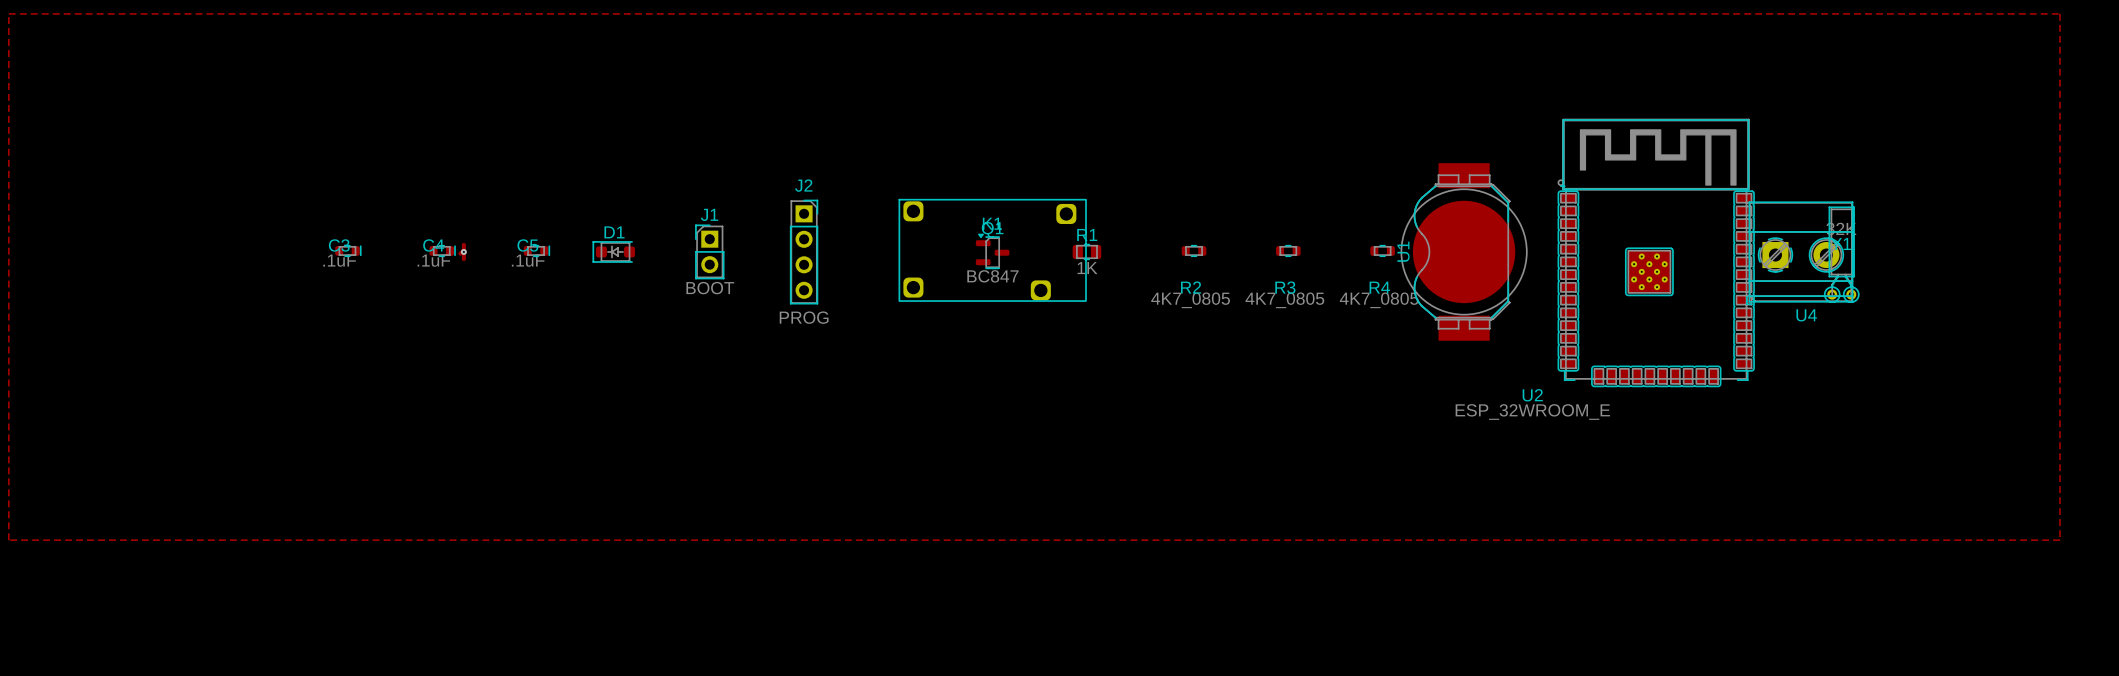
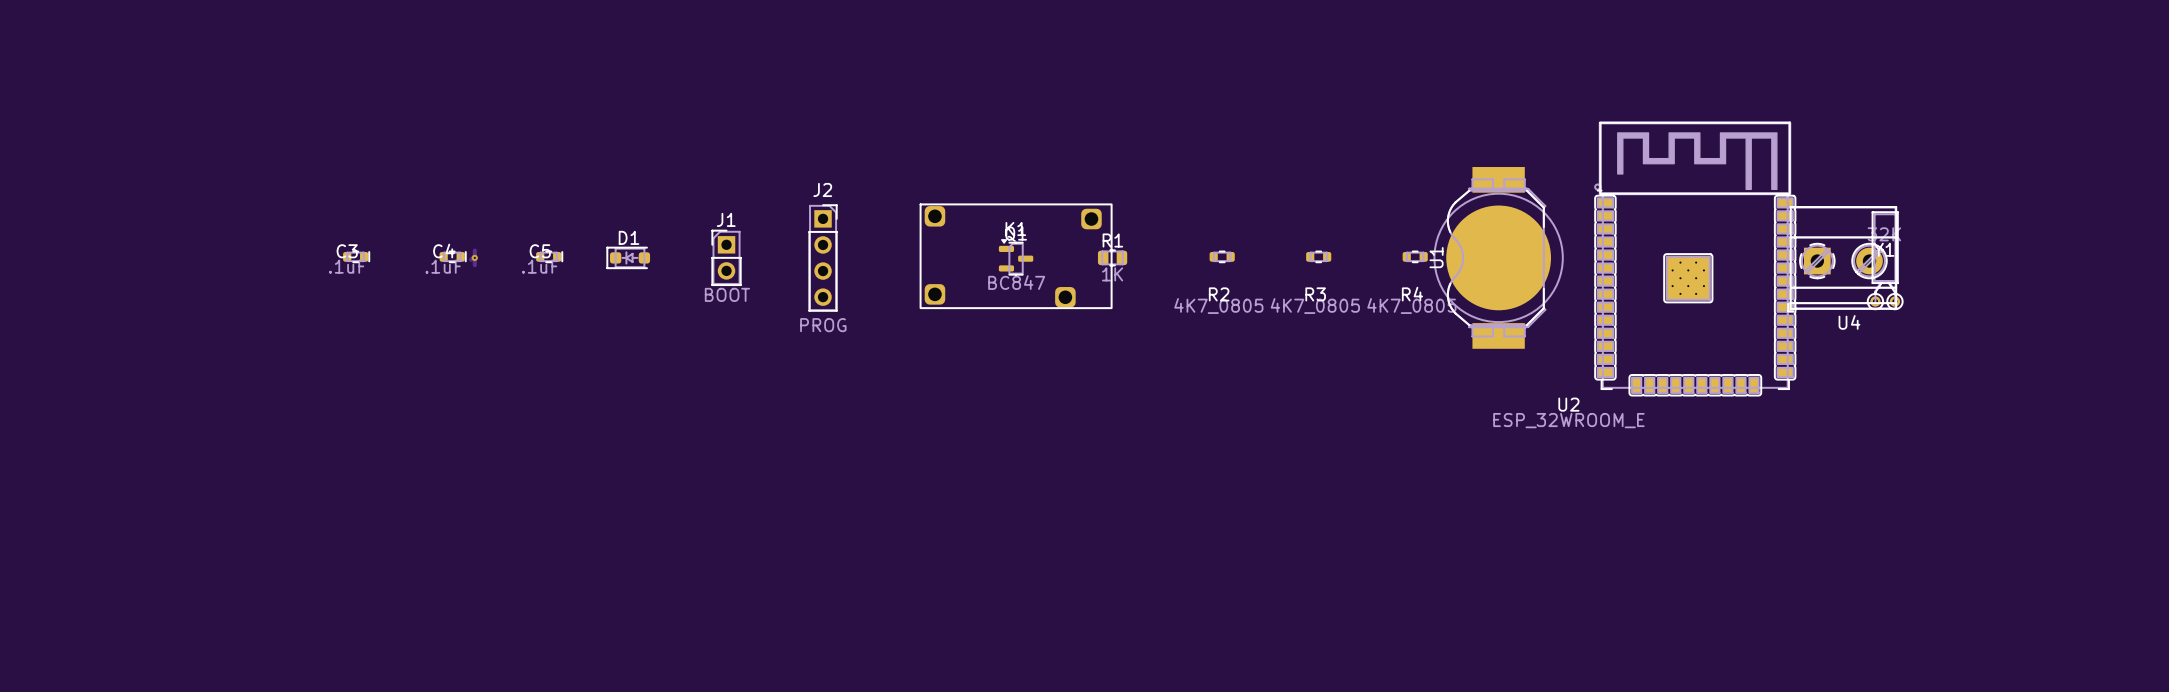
zone outline: (8, 13) (2059, 13) (2059, 540) (8, 540) (8, 13) -> none

